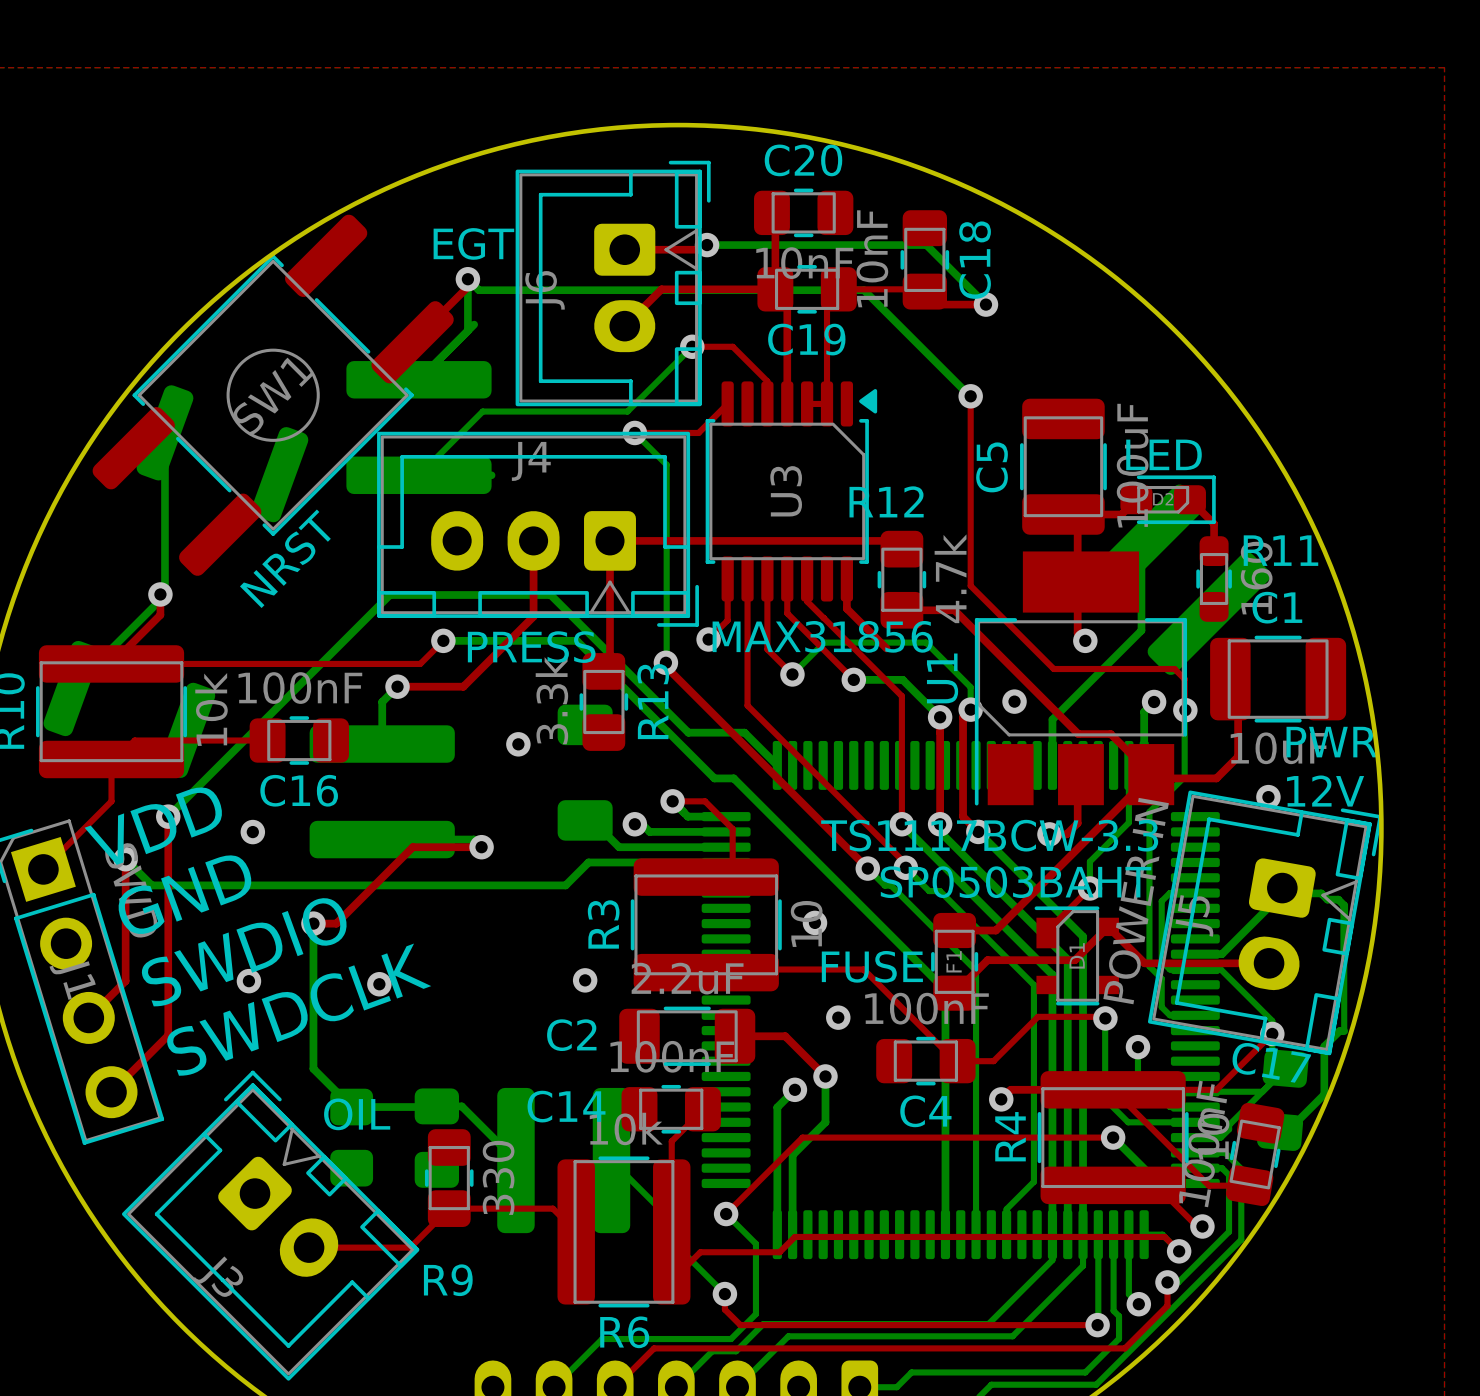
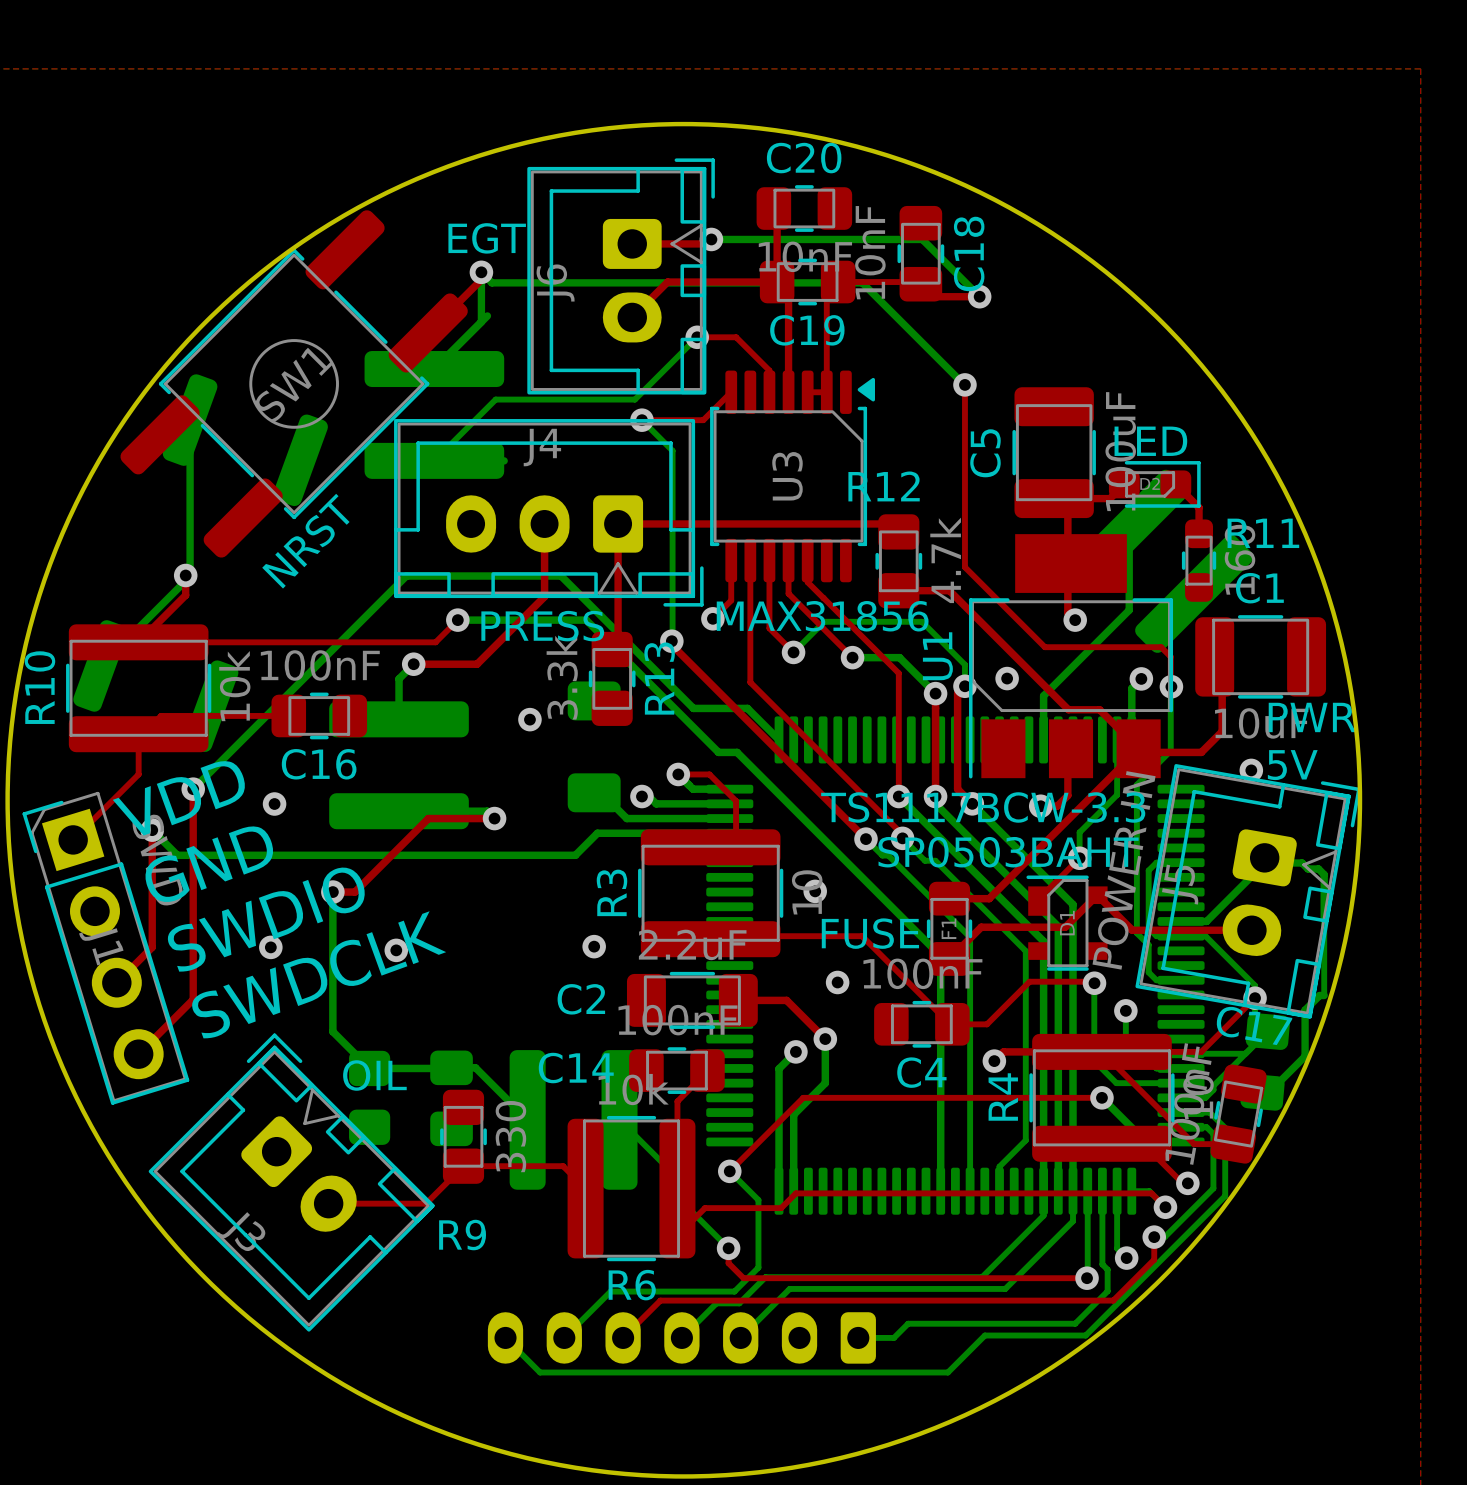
top track: (846, 578) (846, 608) (886, 648) -> none
text: 12V (1325, 791) -> 5V (1292, 765)

